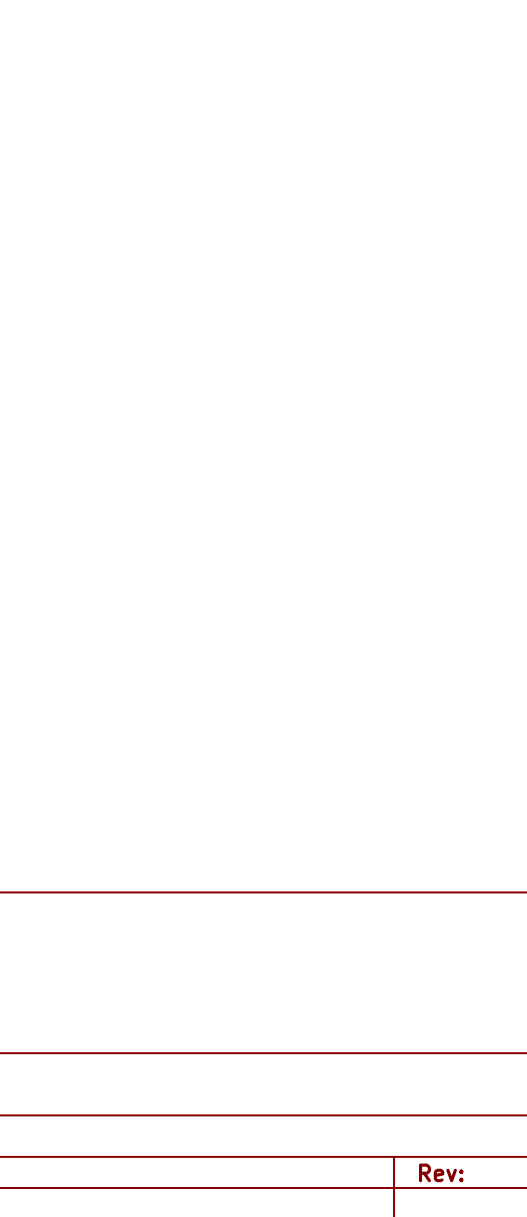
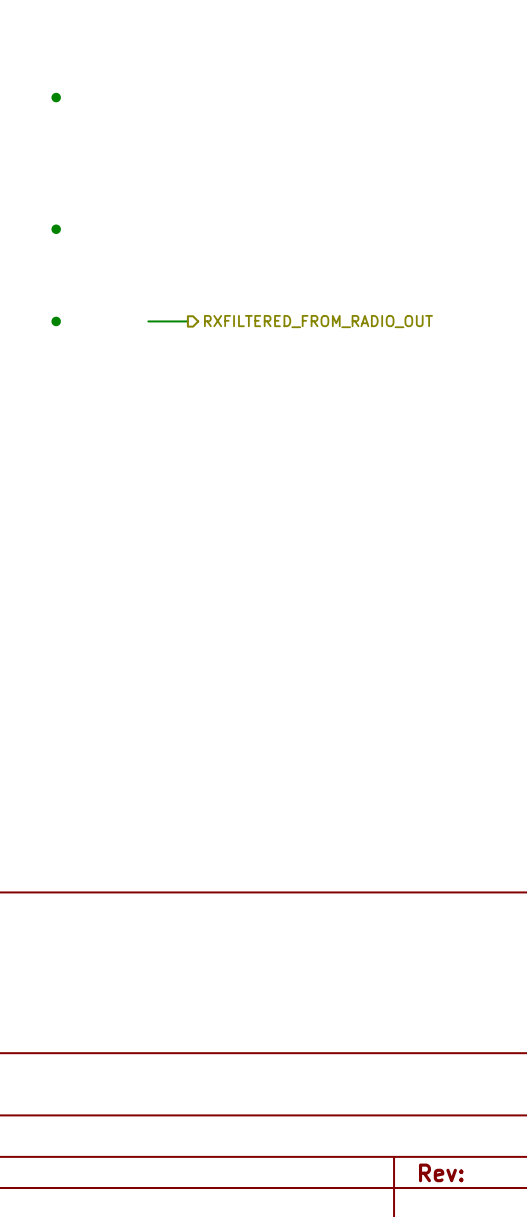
junction: none -> (56, 97)
junction: none -> (56, 229)
junction: none -> (56, 321)
wire: none -> (148, 321) (187, 321)
hierarchical label: none -> RXFILTERED_FROM_RADIO_OUT (318, 321)

